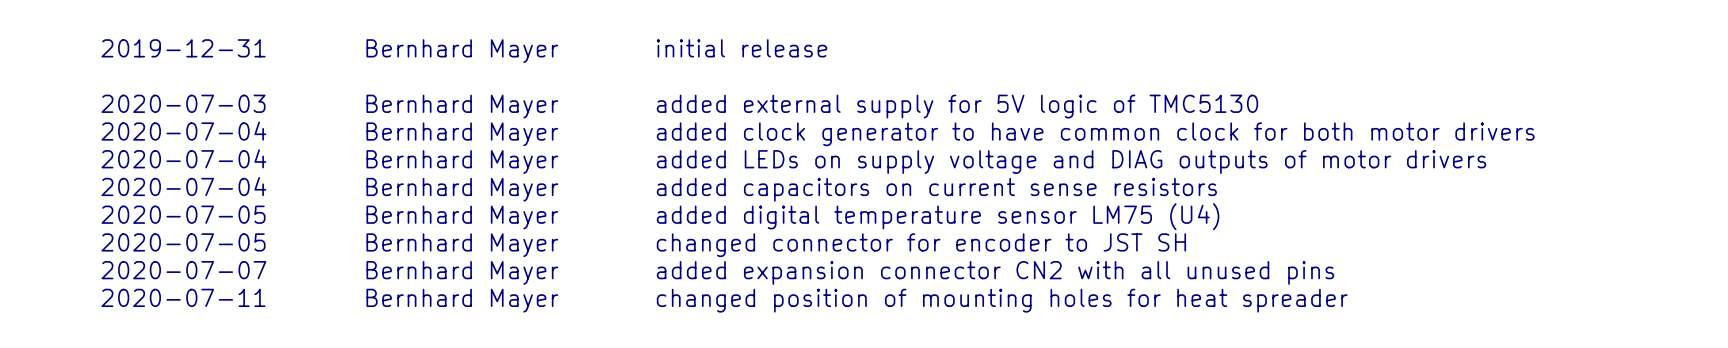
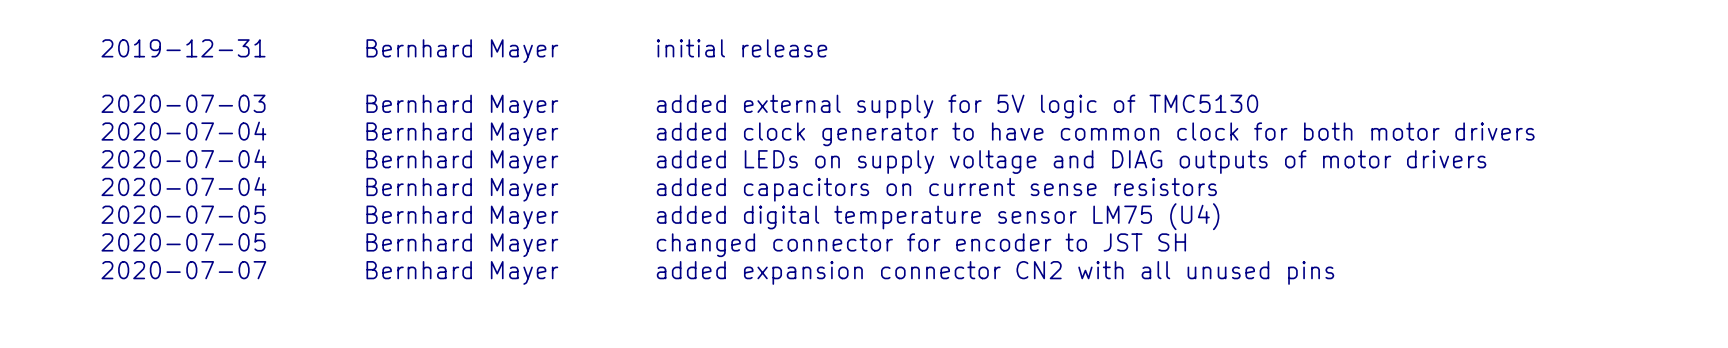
text: 2020-07-11 (183, 297) -> none
text: Bernhard Mayer (462, 300) -> none
text: changed position of mounting holes for heat spreader (1002, 300) -> none

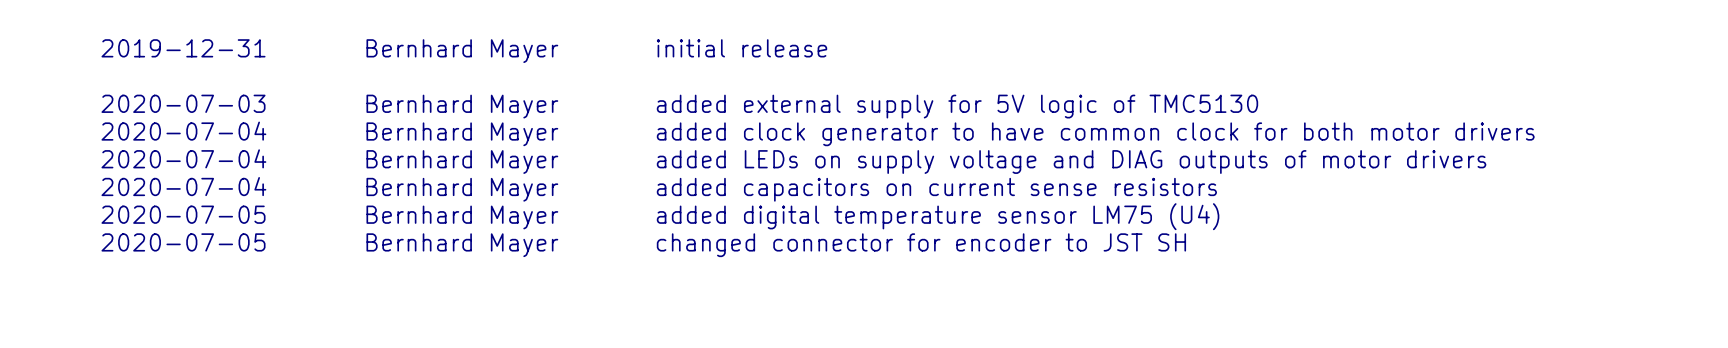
text: 2020-07-07 (183, 270) -> none
text: Bernhard Mayer (462, 272) -> none
text: added expansion connector CN2 with all unused pins (995, 272) -> none

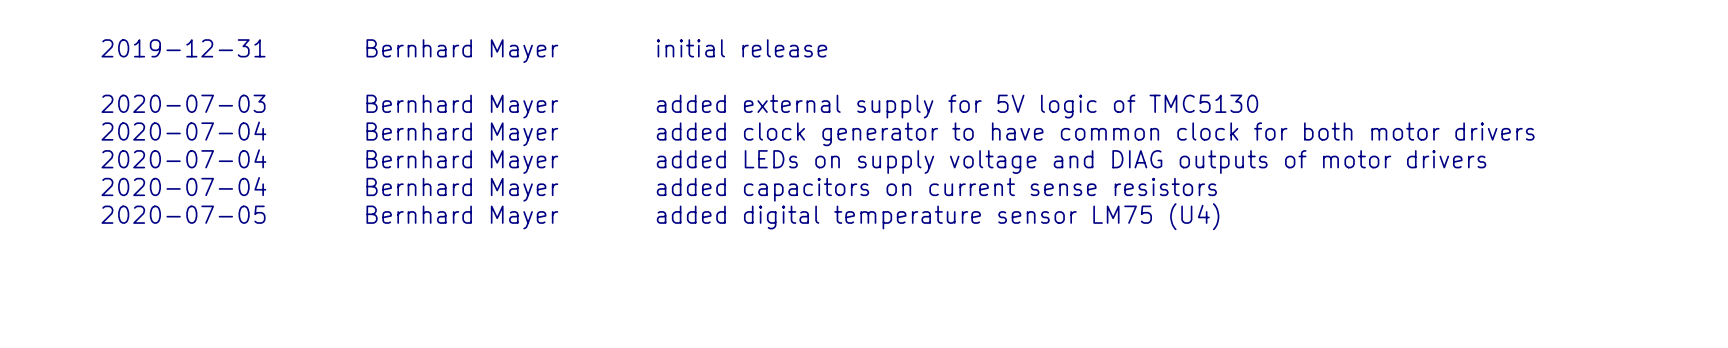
text: 2020-07-05 (183, 242) -> none
text: Bernhard Mayer (462, 245) -> none
text: changed connector for encoder to JST SH (921, 245) -> none

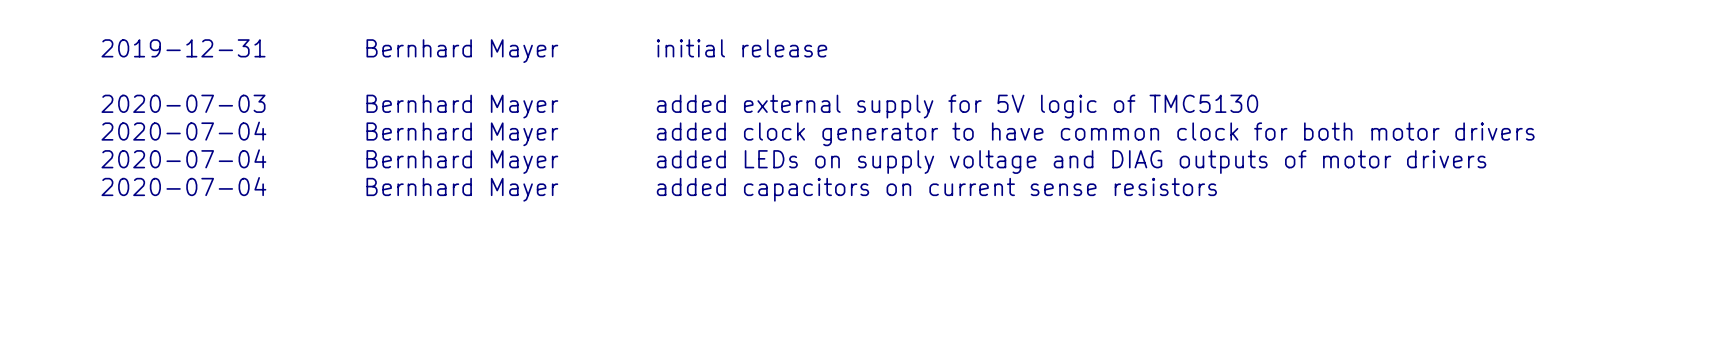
text: 2020-07-05 (183, 214) -> none
text: added digital temperature sensor LM75 (U4) (938, 216) -> none
text: Bernhard Mayer (462, 217) -> none

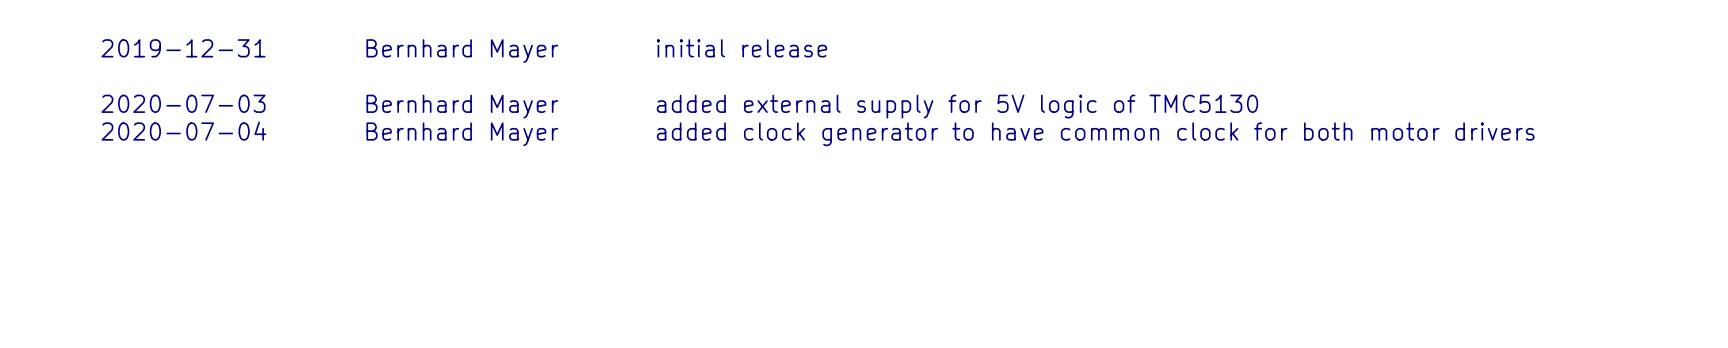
text: 2020-07-04 (183, 158) -> none
text: Bernhard Mayer (462, 162) -> none
text: added LEDs on supply voltage and DIAG outputs of motor drivers (1071, 162) -> none
text: 2020-07-04 (183, 186) -> none
text: Bernhard Mayer (462, 189) -> none
text: added capacitors on current sense resistors (936, 189) -> none

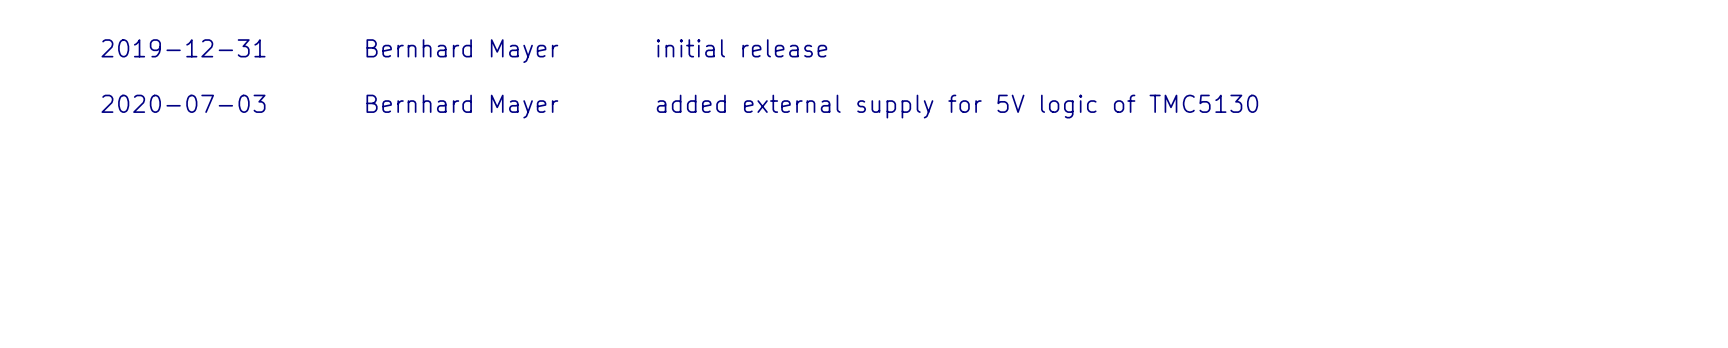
text: 2020-07-04 (183, 131) -> none
text: Bernhard Mayer (462, 134) -> none
text: added clock generator to have common clock for both motor drivers (1095, 134) -> none

